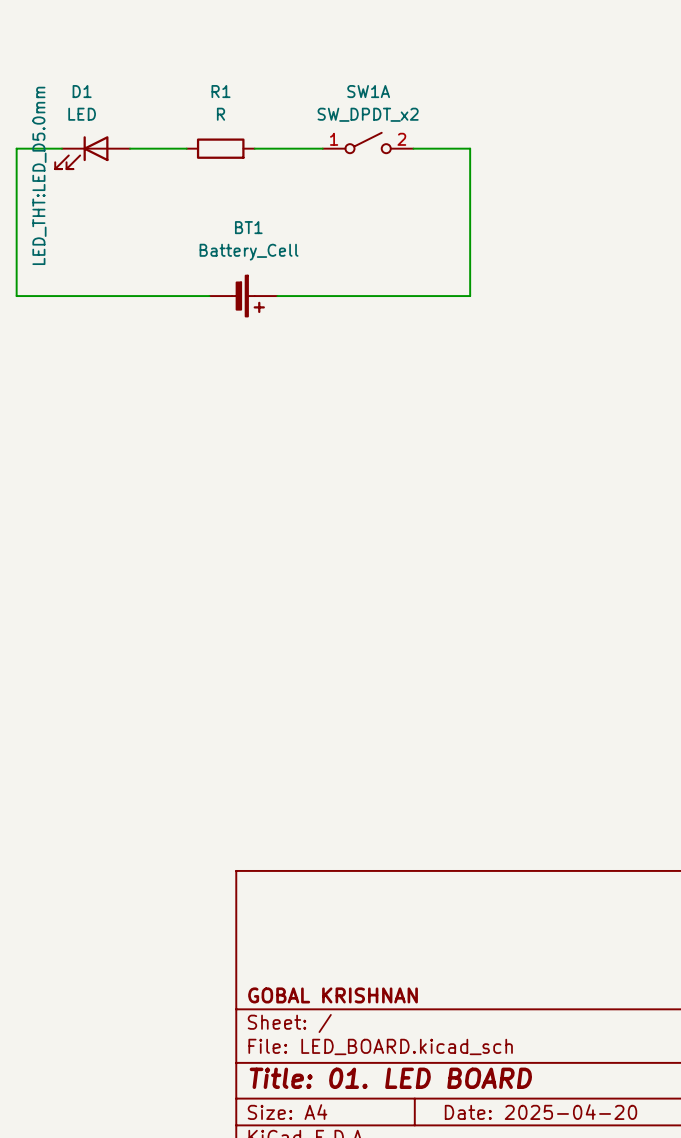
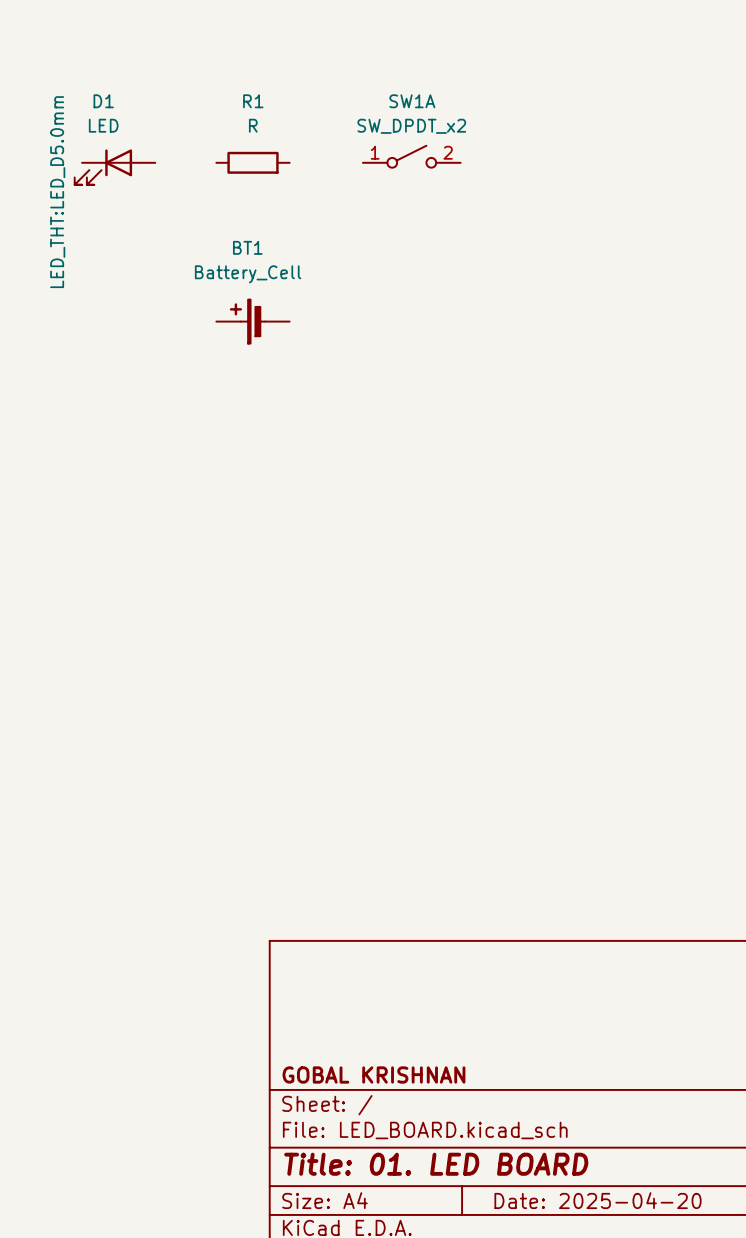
wire: (62, 148) (16, 148) (16, 296) (209, 296) -> none
wire: (130, 148) (186, 148) -> none
wire: (254, 148) (322, 148) -> none
wire: (413, 148) (470, 148) (470, 296) (277, 296) -> none
BT1 rotation: 0° (248, 296) -> 180° (247, 321)

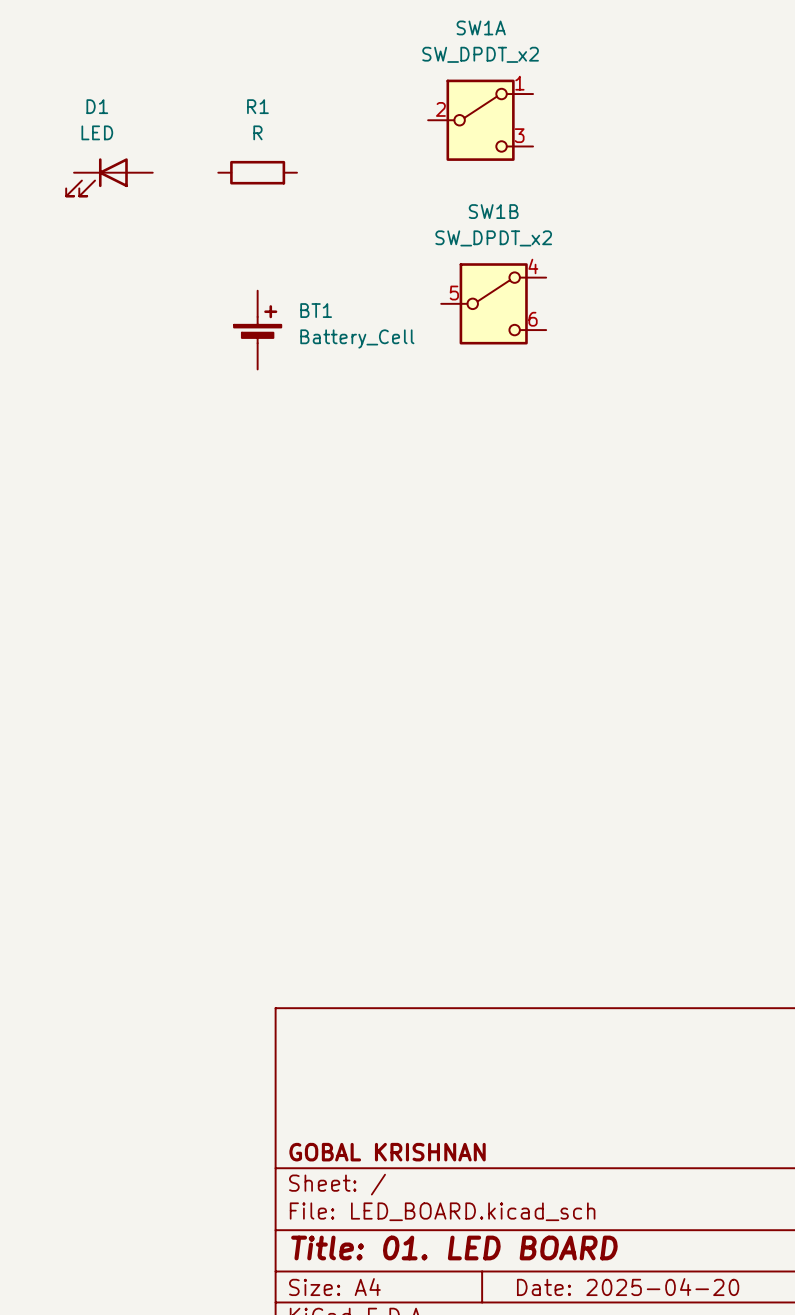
SW1A name position: SW1A (412, 101) -> SW1A (481, 27)
SW1A value position: SW_DPDT_x2 (411, 126) -> SW_DPDT_x2 (480, 54)
SW1A symbol: [362, 145, 461, 168] -> [428, 79, 534, 161]
D1 text: LED_THT:LED_D5.0mm (57, 192) -> none
BT1 name position: BT1 (247, 247) -> BT1 (316, 310)
BT1 value position: Battery_Cell (248, 274) -> Battery_Cell (357, 338)
SW1B: none -> SW_DPDT_x2 (493, 303)
BT1 rotation: 0° (247, 321) -> 90° clockwise (257, 324)

